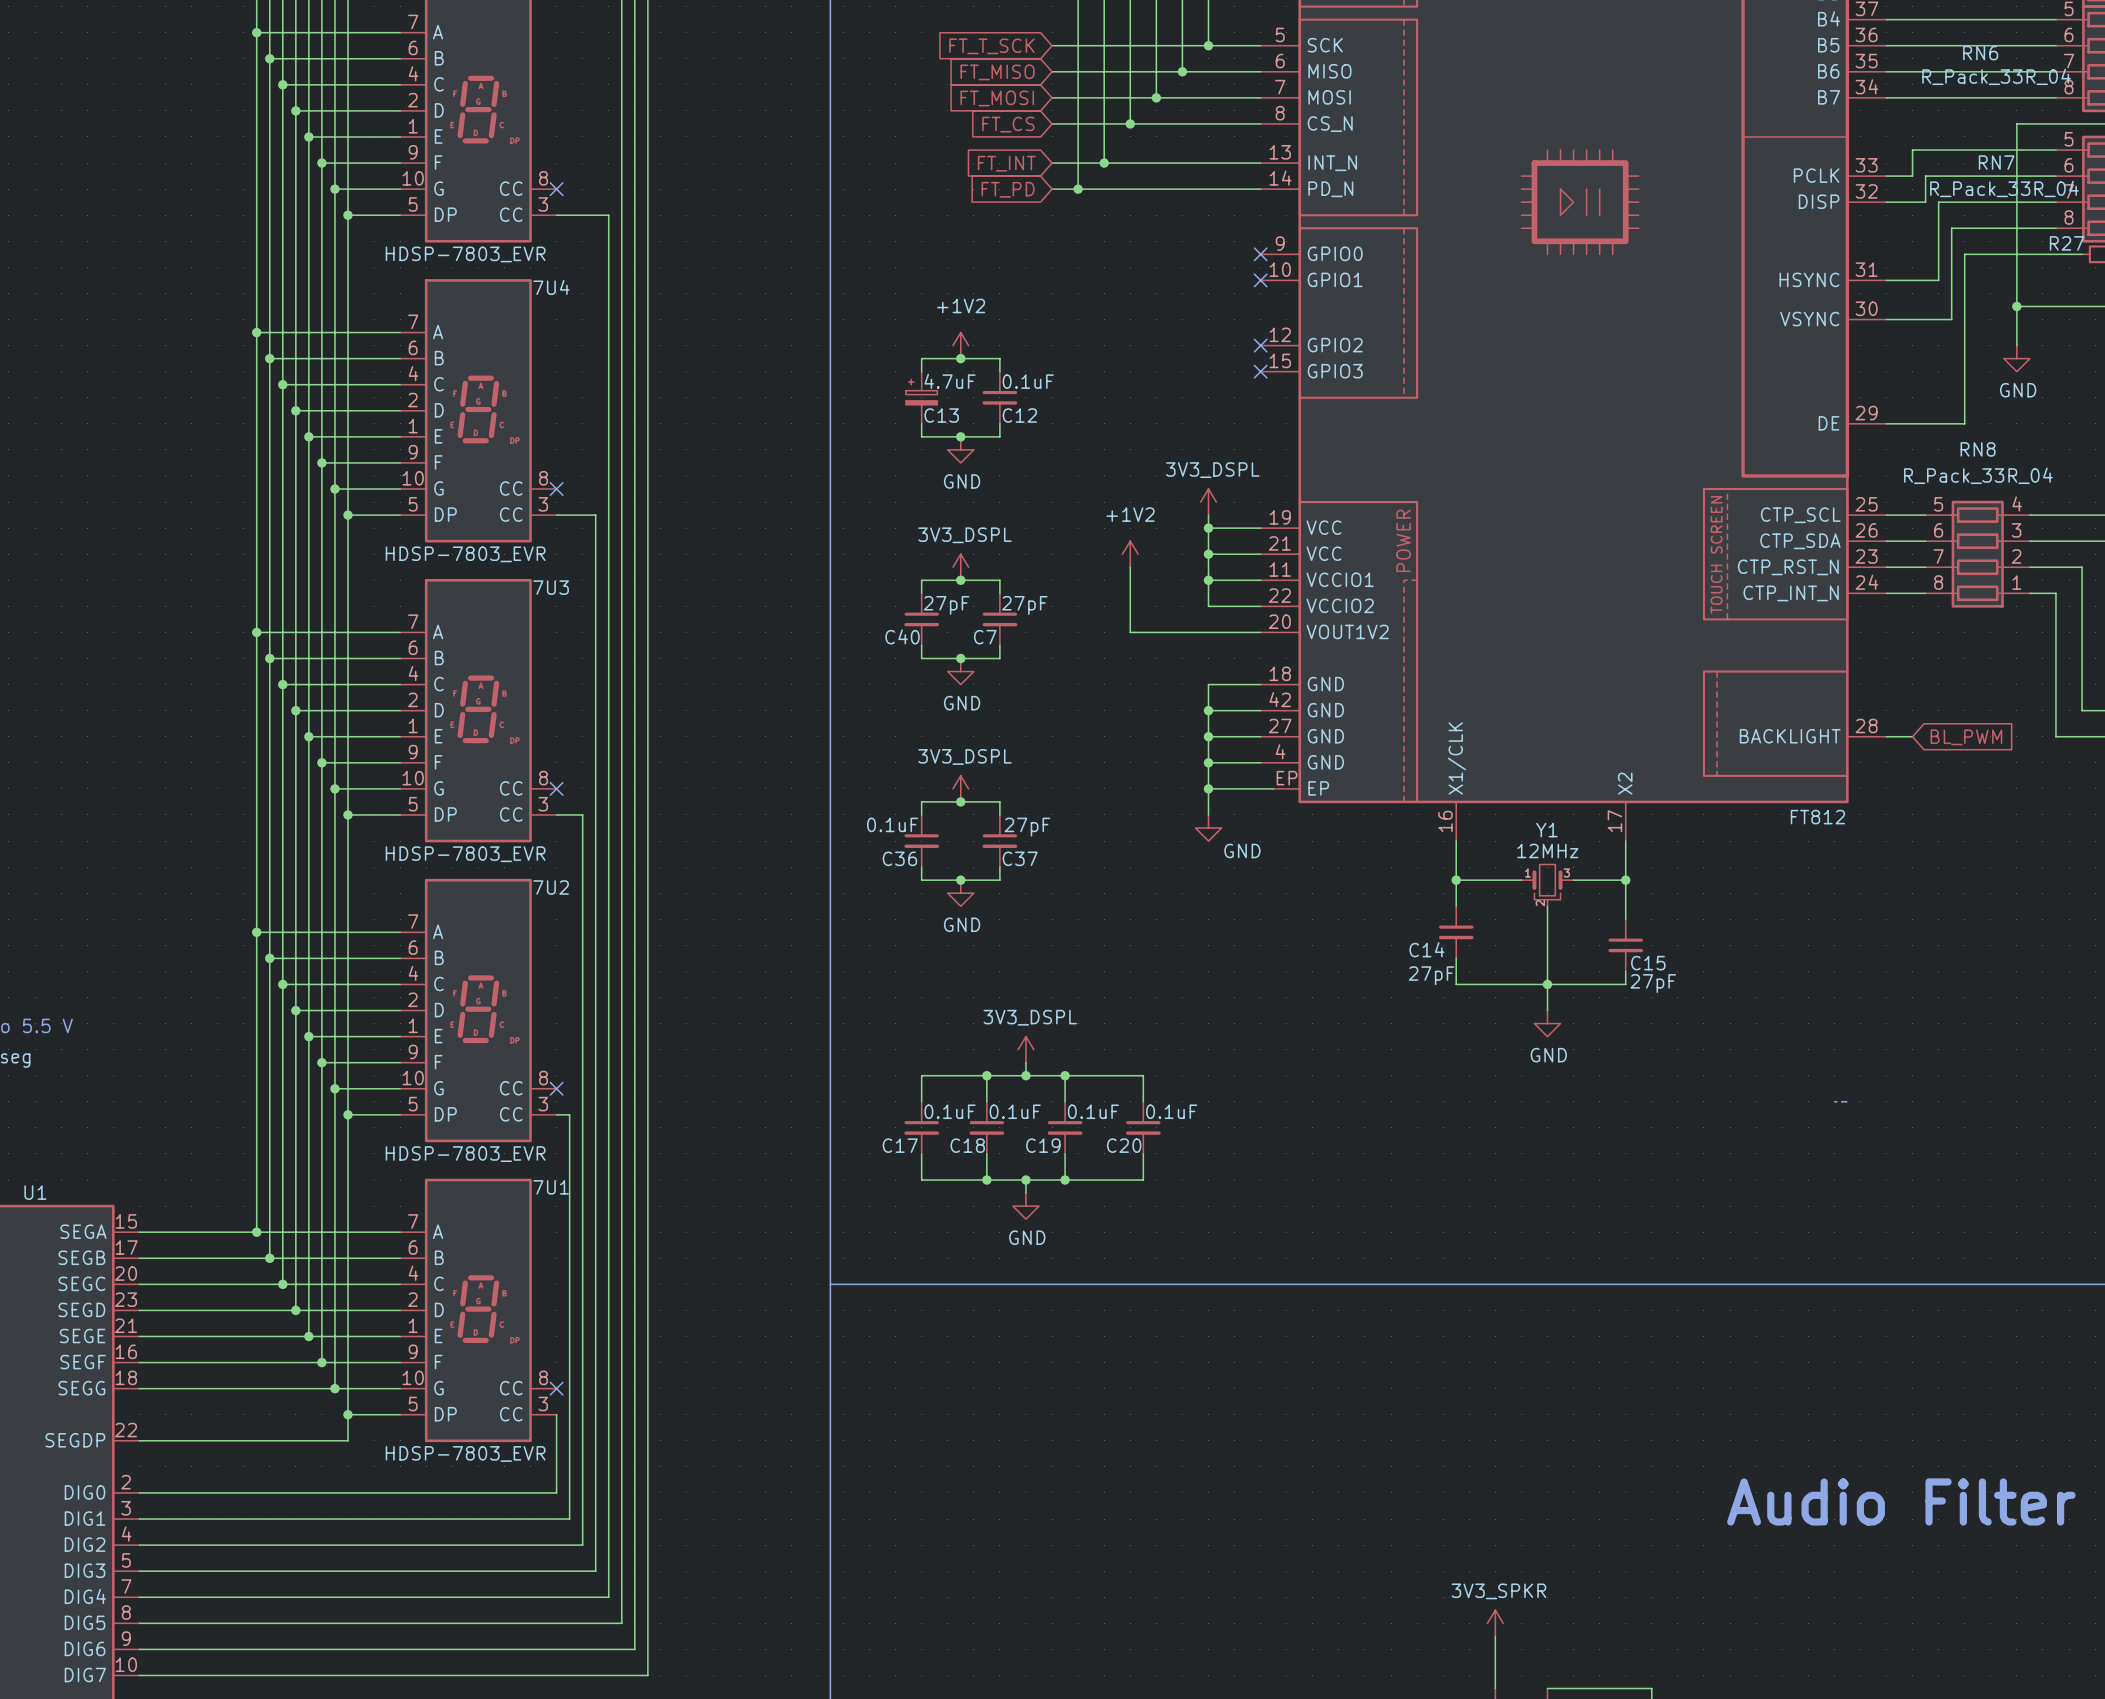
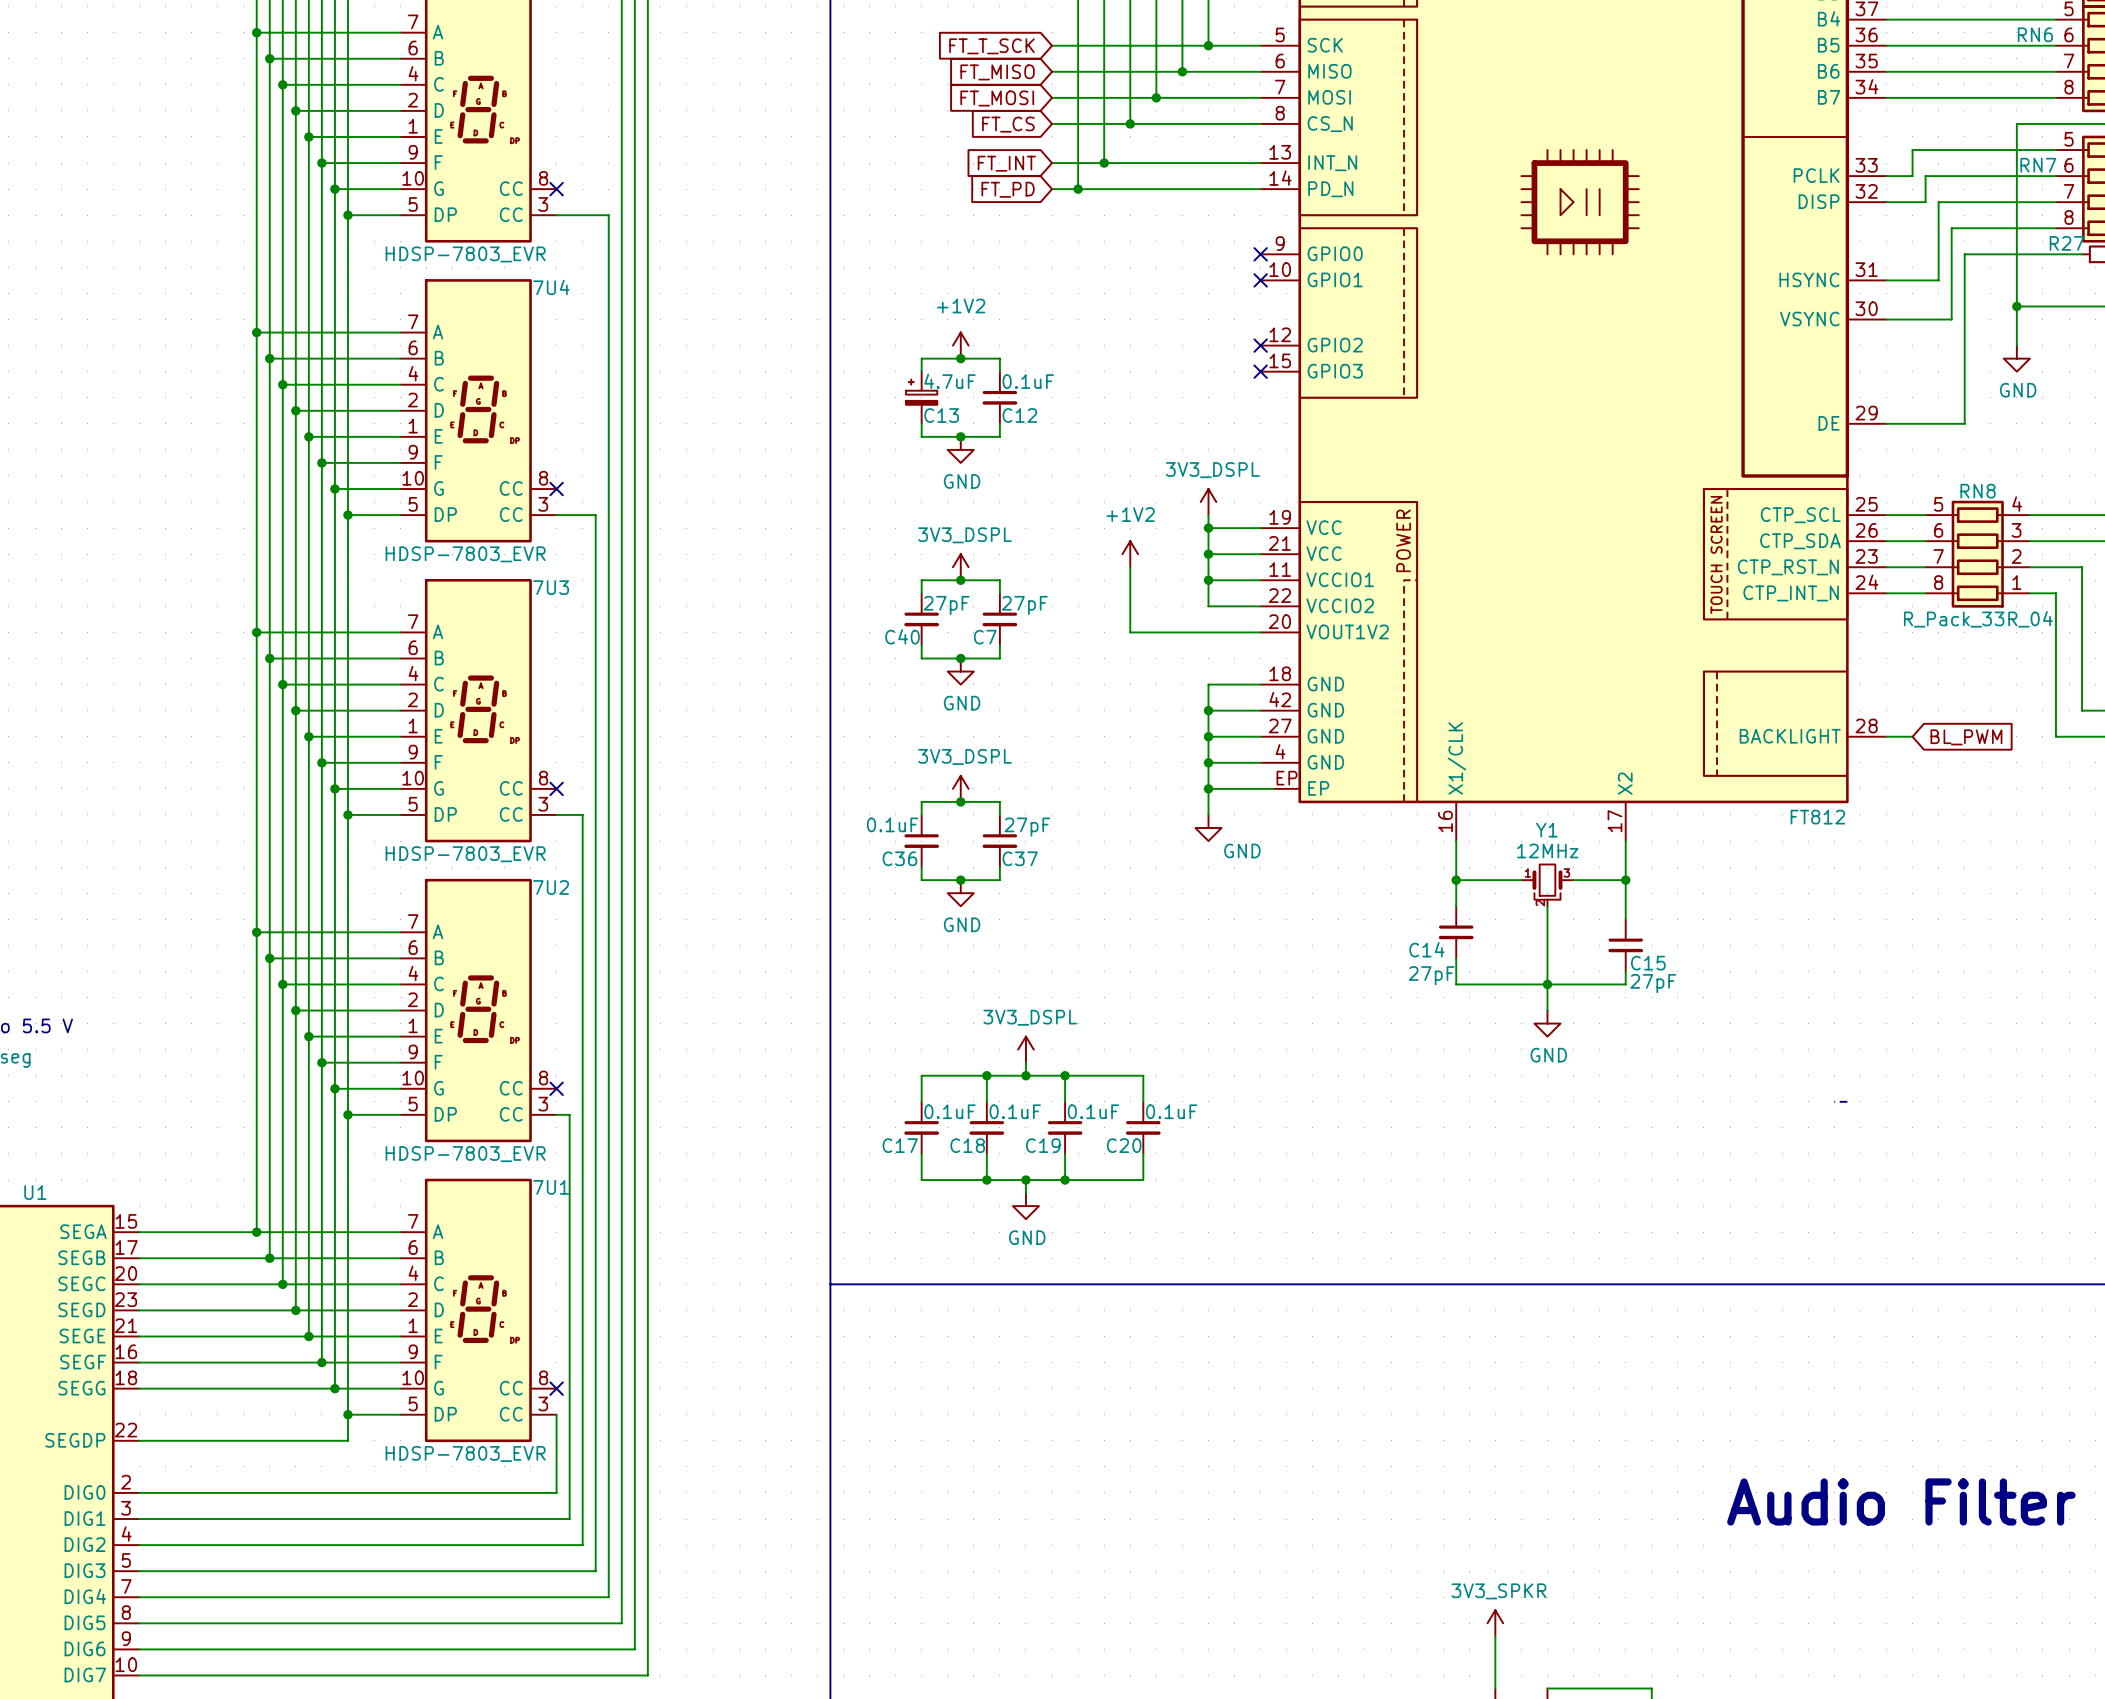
RN6 name position: RN6 (1980, 53) -> RN6 (2035, 34)
RN6 value: R_Pack_33R_04 (1996, 76) -> none
RN7 name position: RN7 (1996, 162) -> RN7 (2038, 165)
RN7 value: R_Pack_33R_04 (2004, 188) -> none
RN8 name position: RN8 (1978, 449) -> RN8 (1978, 491)
RN8 value position: R_Pack_33R_04 (1978, 475) -> R_Pack_33R_04 (1978, 619)

